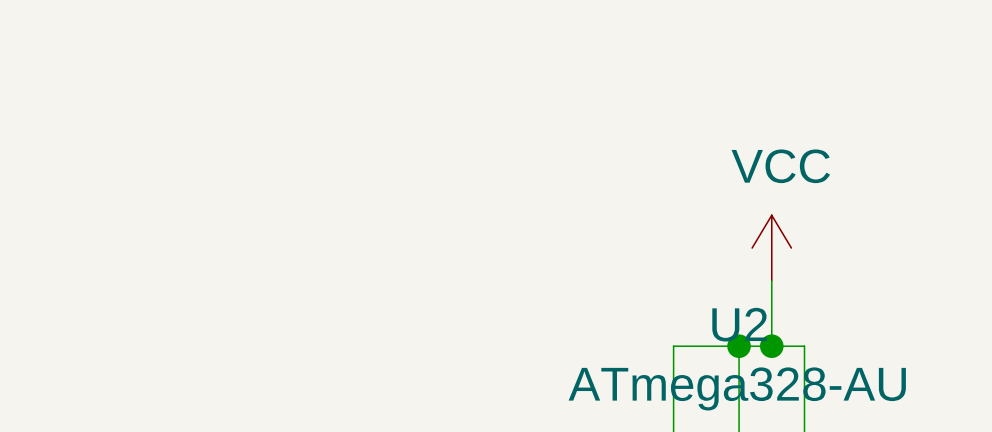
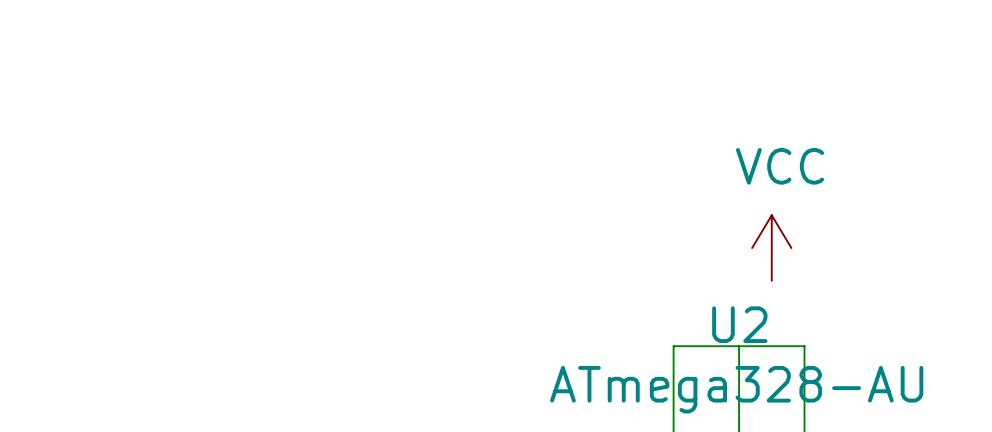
wire: (771, 280) (771, 346) -> none
junction: (739, 346) -> none
junction: (771, 346) -> none

